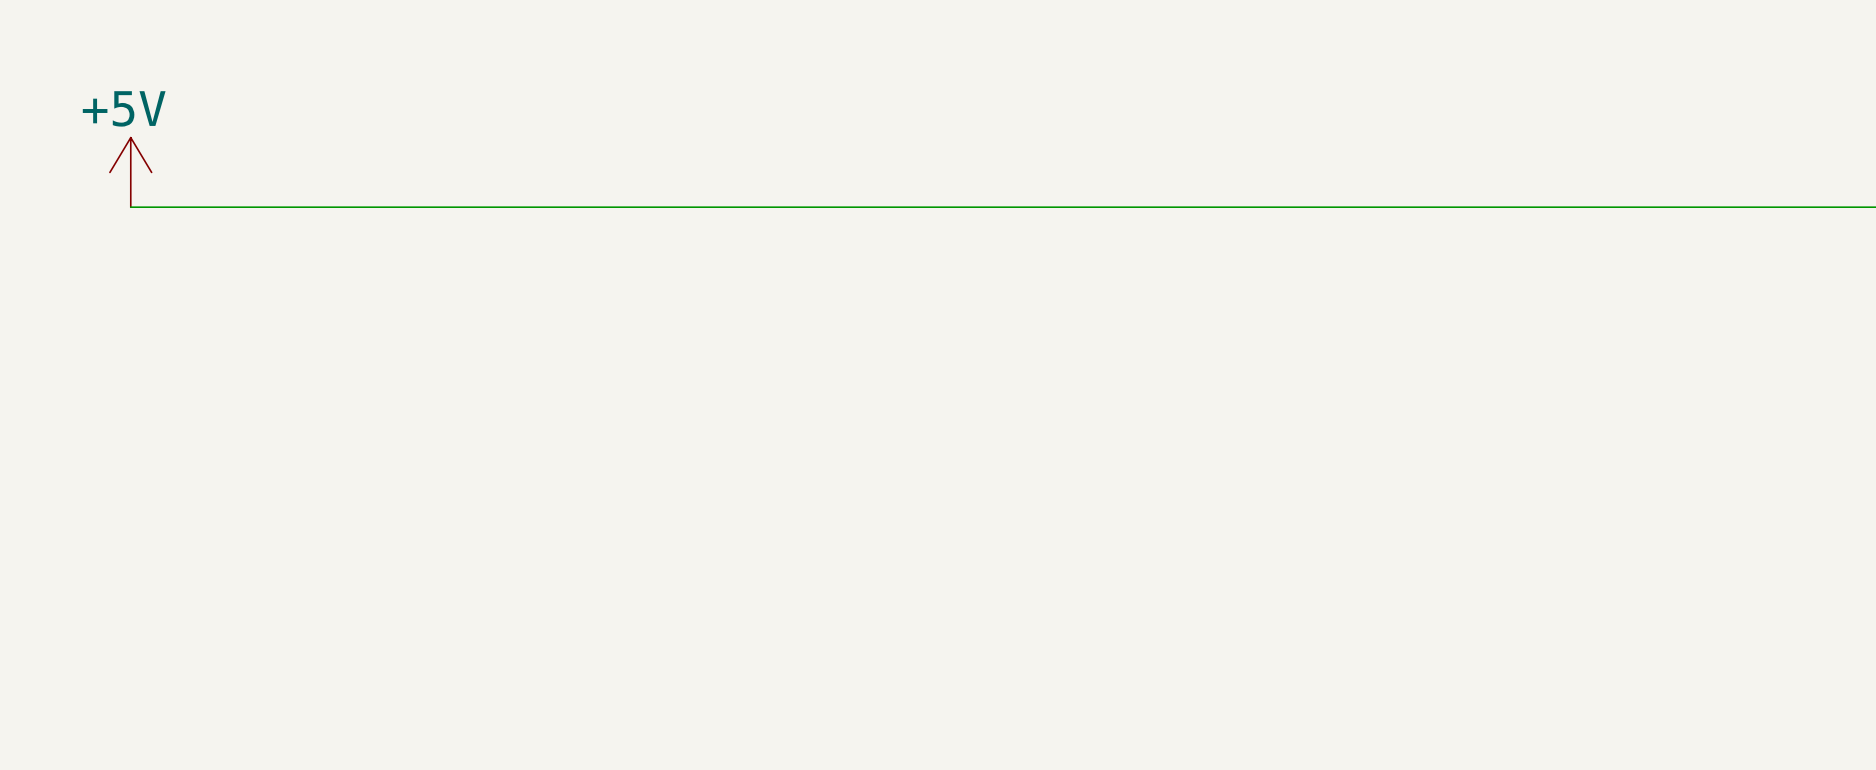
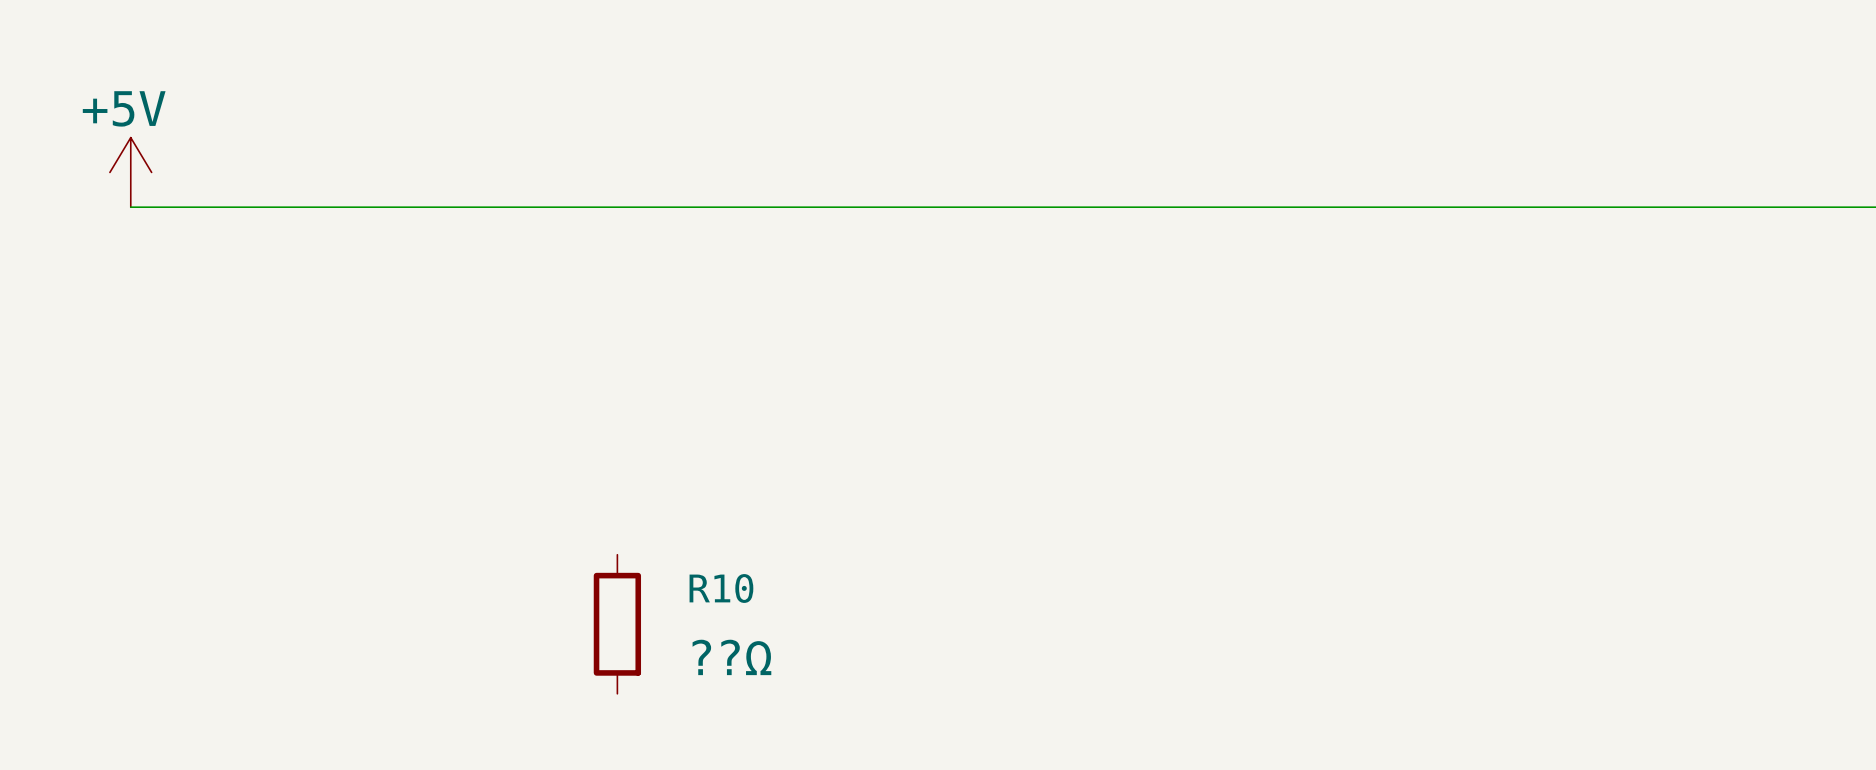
R10: none -> ??Ω (617, 624)

